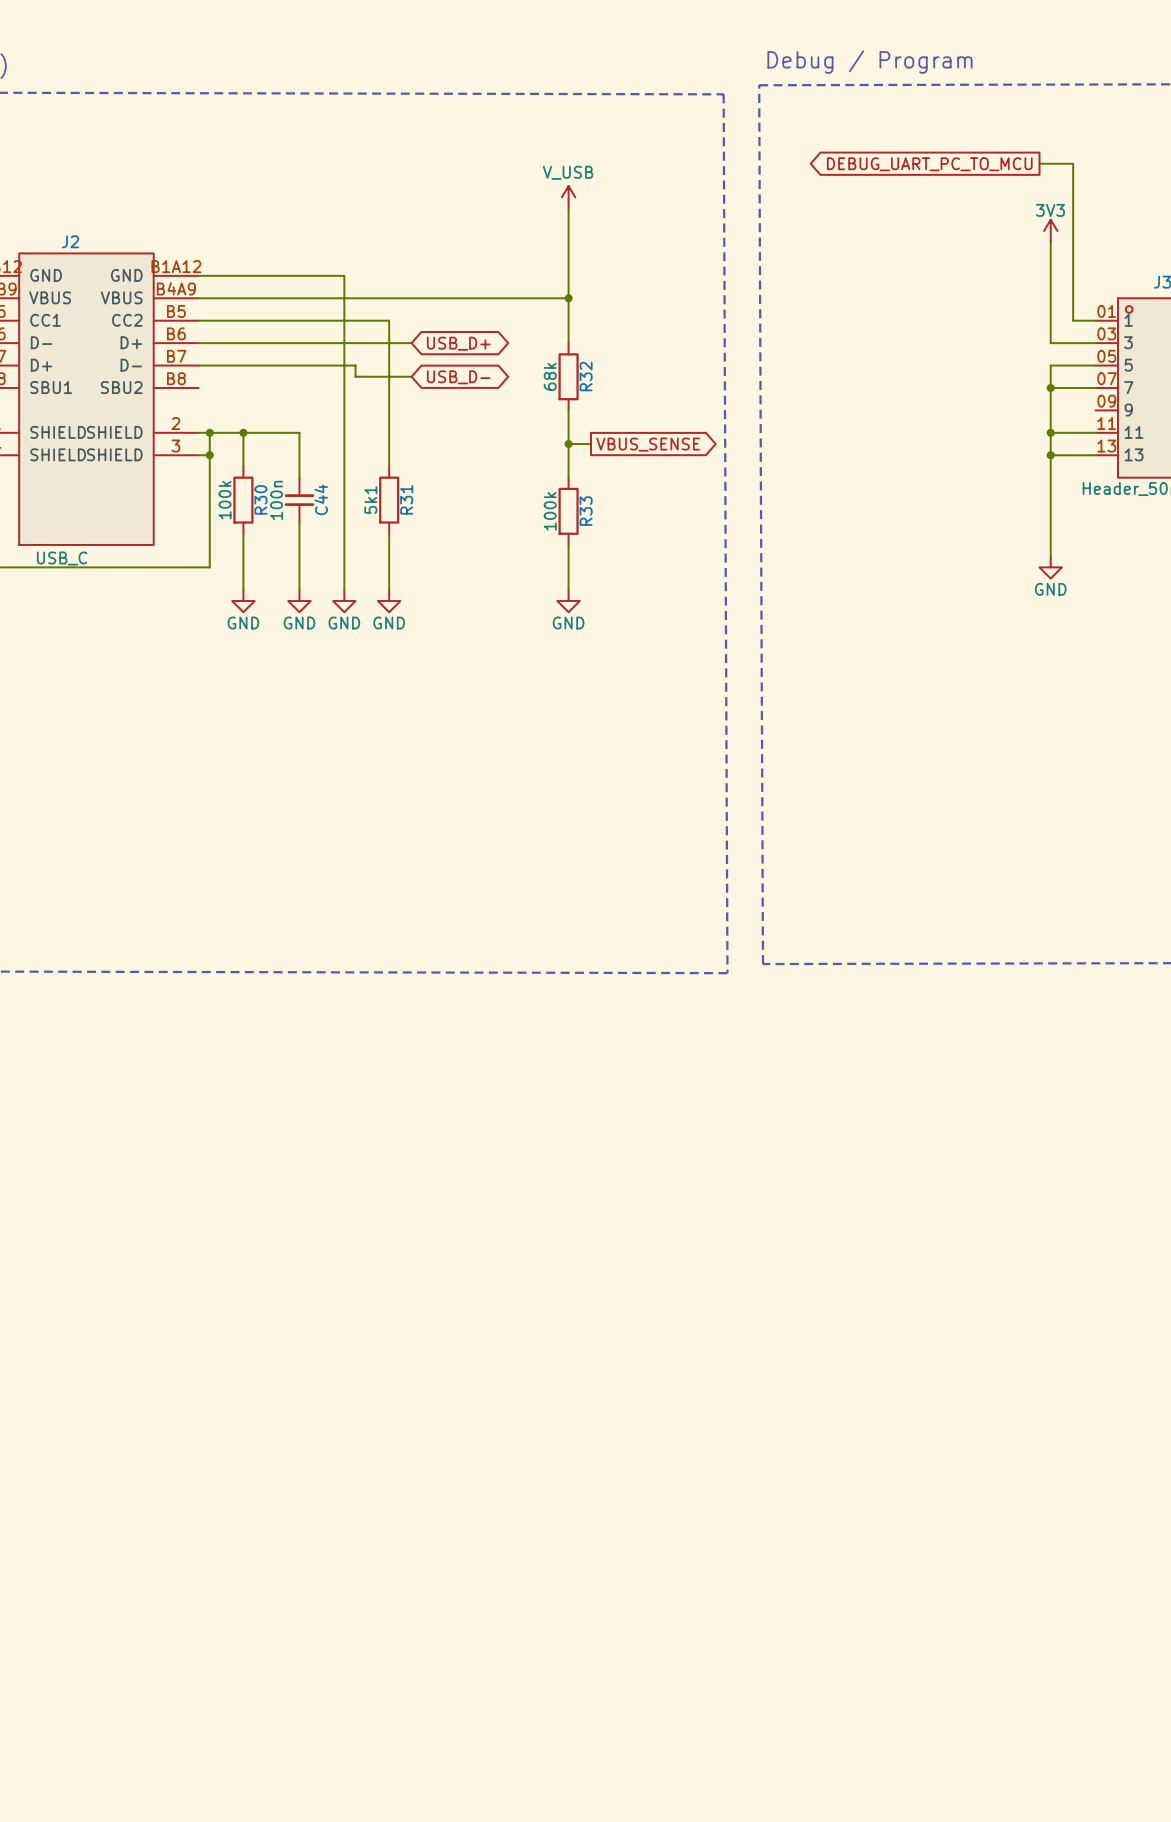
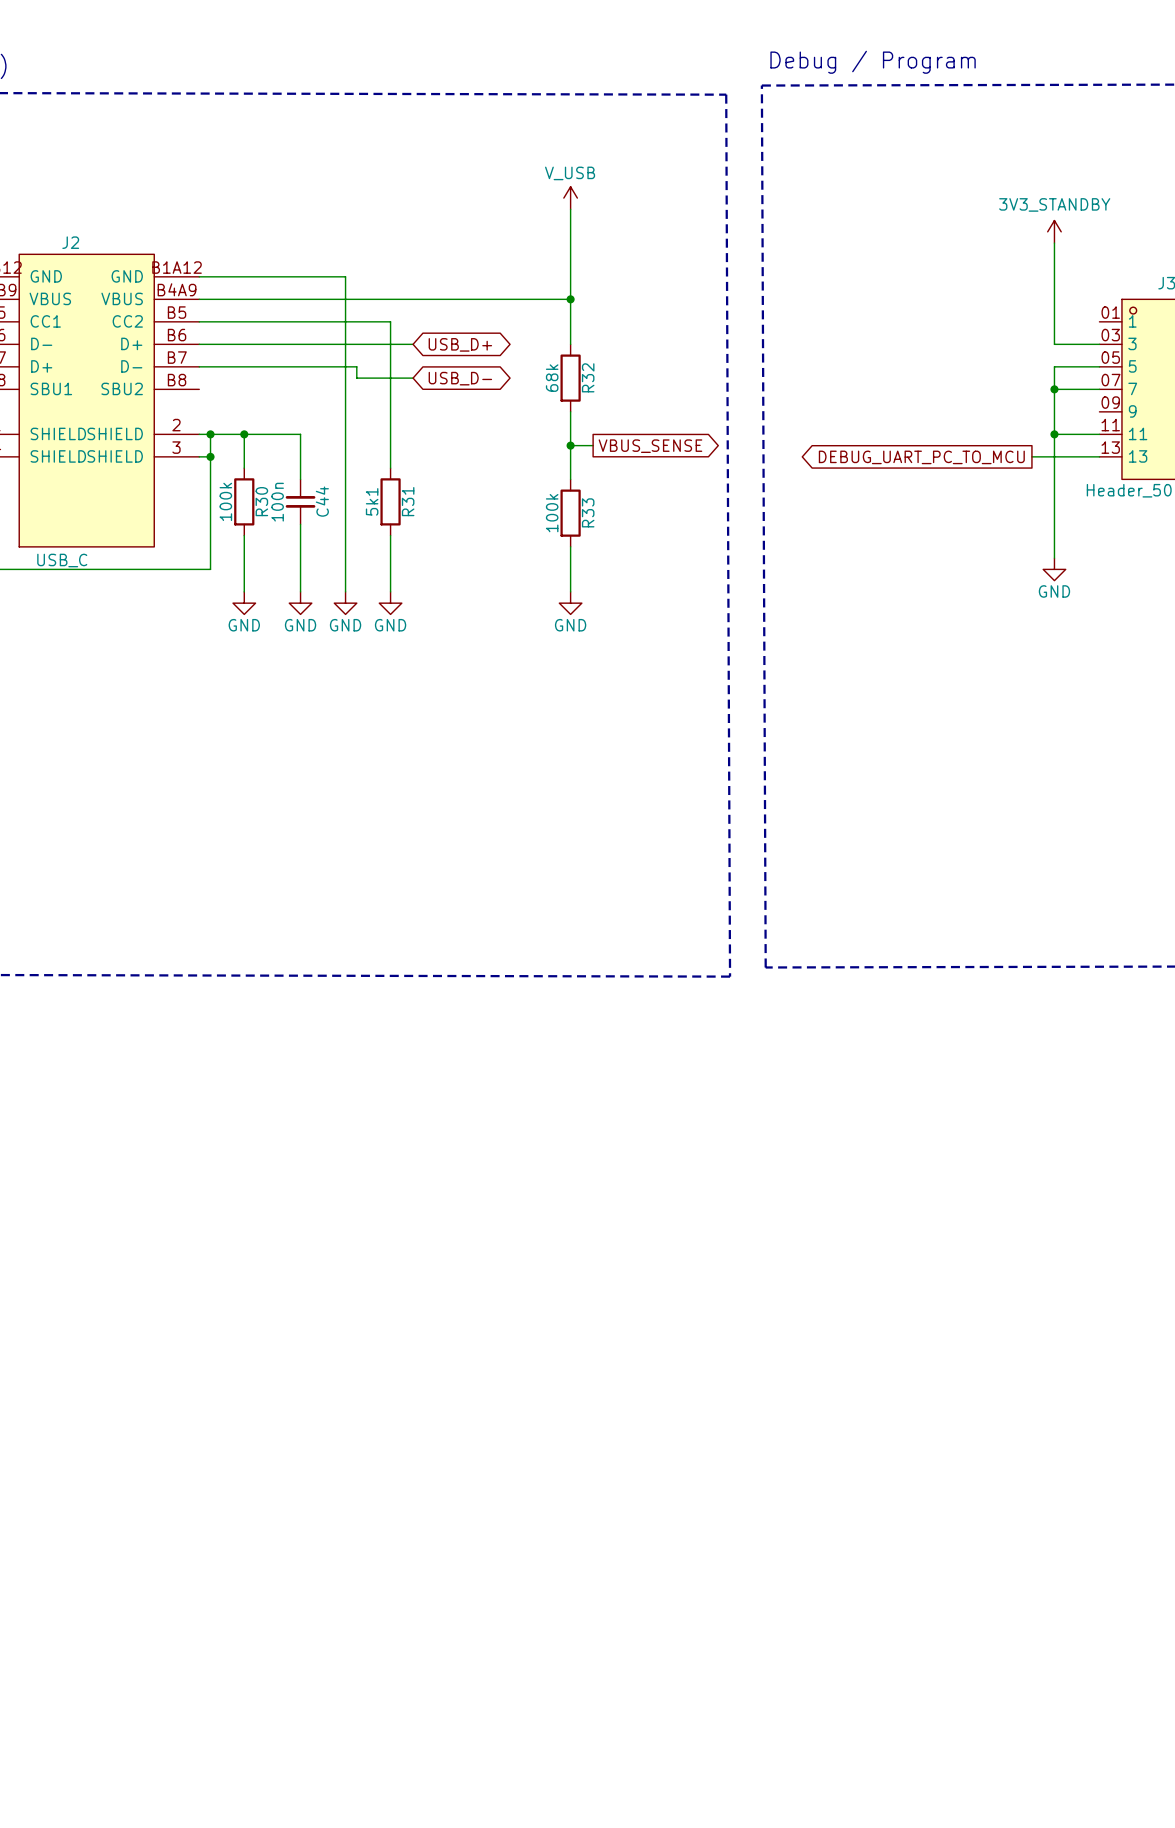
wire: (1039, 163) (1073, 163) (1073, 320) (1095, 320) -> none
global label: DEBUG_UART_PC_TO_MCU (929, 164) -> none
power symbol: 3V3 (1050, 231) -> 3V3_STANDBY (1054, 231)
global label: none -> DEBUG_UART_PC_TO_MCU (921, 457)
wire: none -> (1031, 456) (1054, 456)
junction: (1050, 455) -> none

